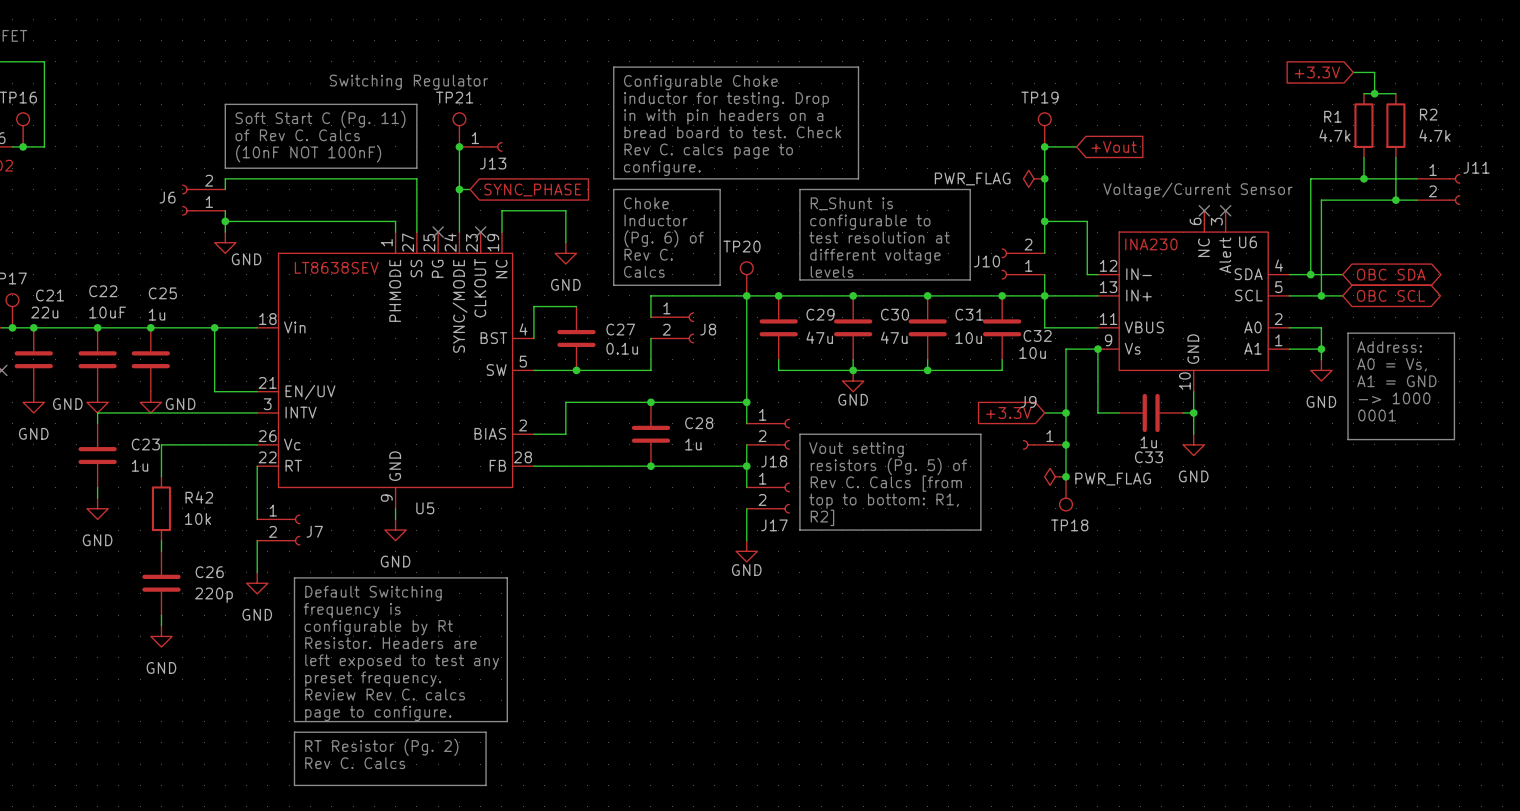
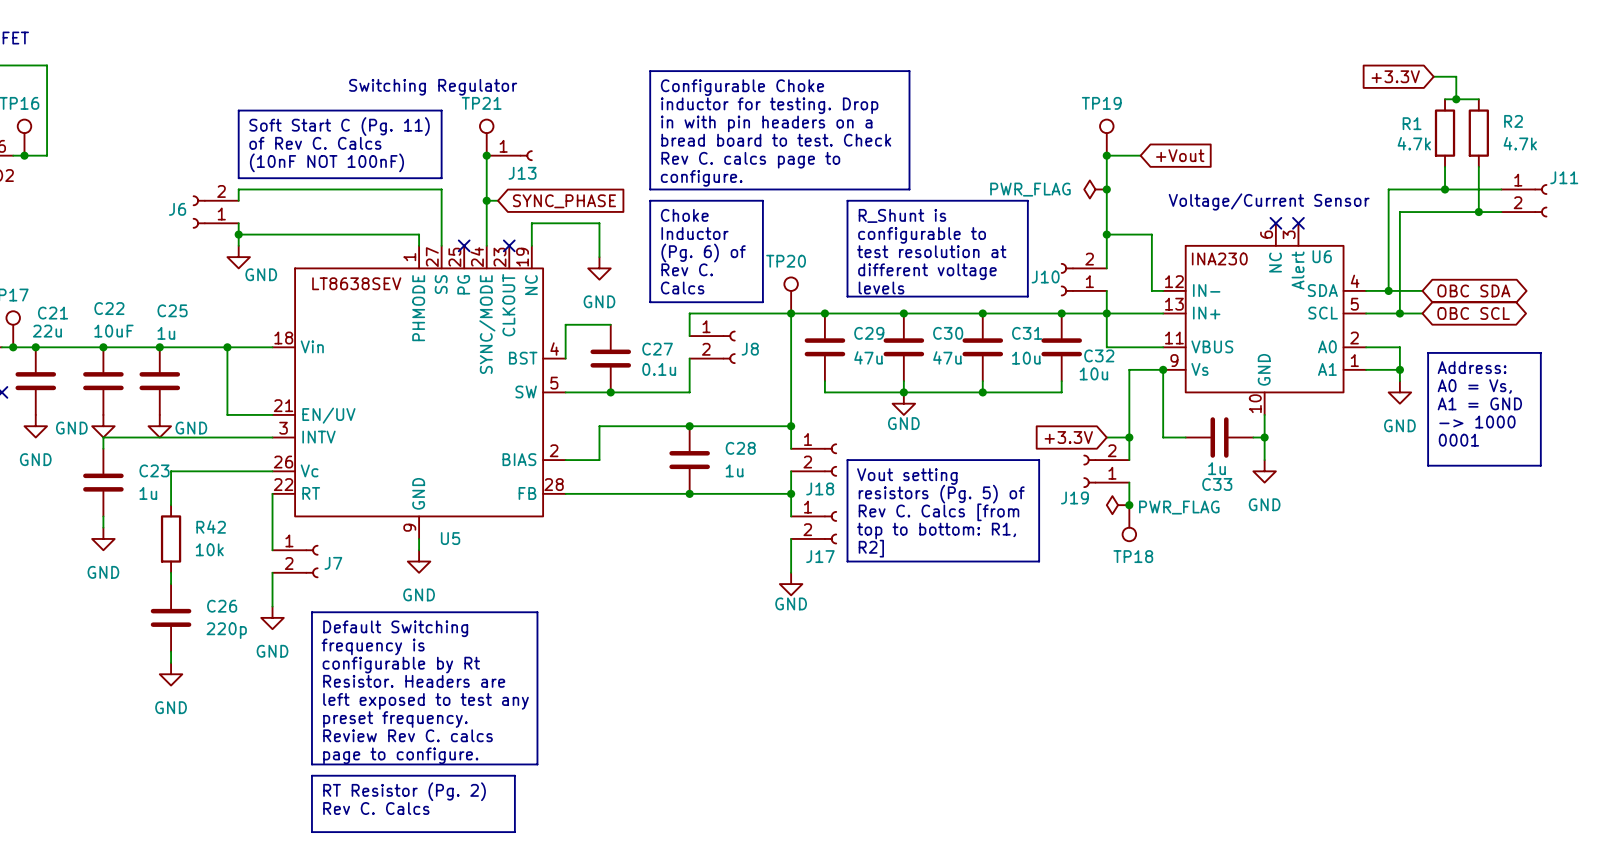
wire: (1066, 434) (1066, 455) -> none
J9: (1044, 444) -> none
J19: none -> (1106, 471)
junction: (1066, 444) -> none

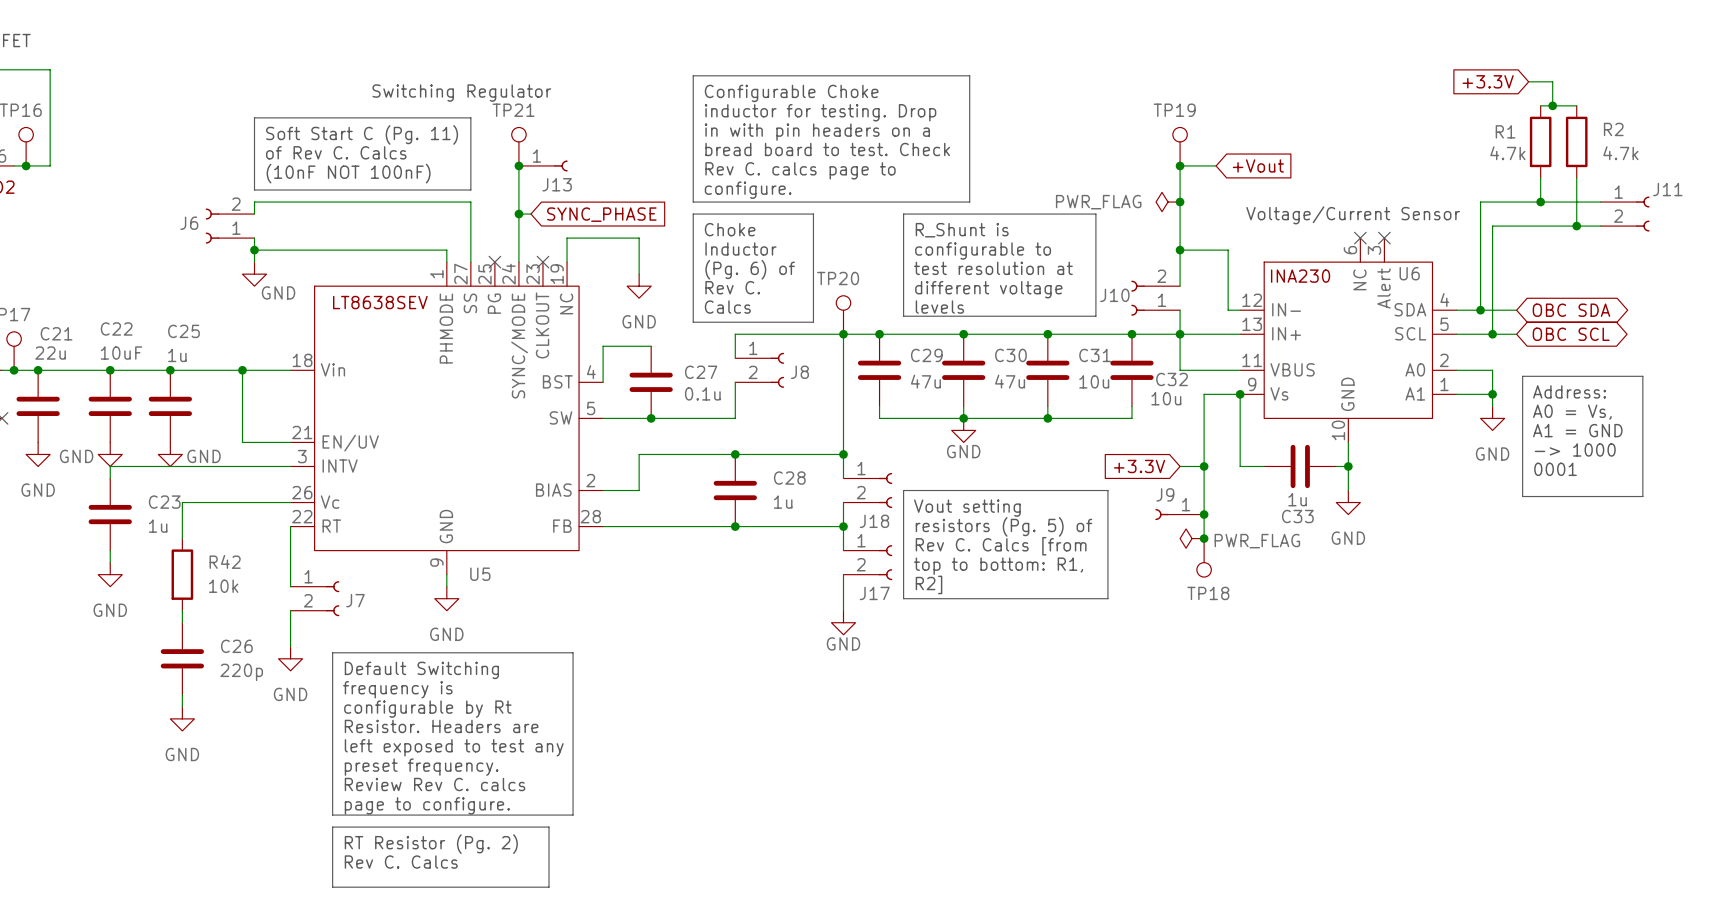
wire: none -> (1204, 490) (1204, 514)
J19: (1106, 471) -> none
J9: none -> (1179, 514)
junction: none -> (1204, 514)

